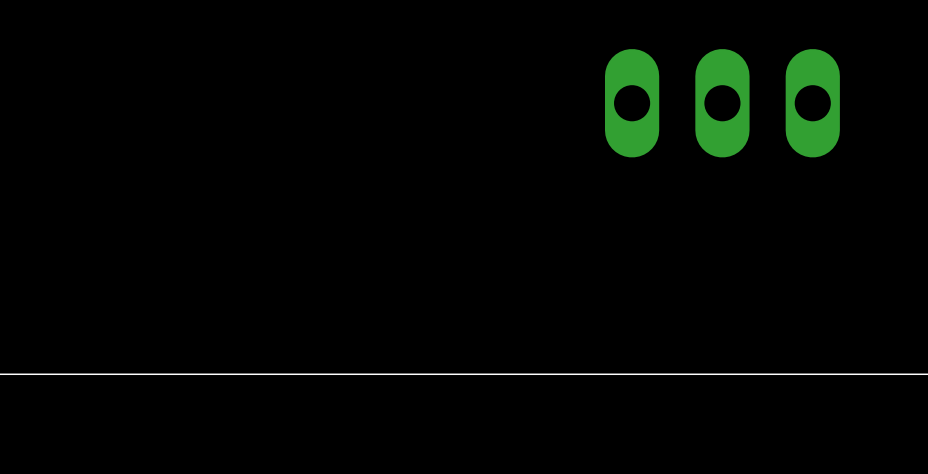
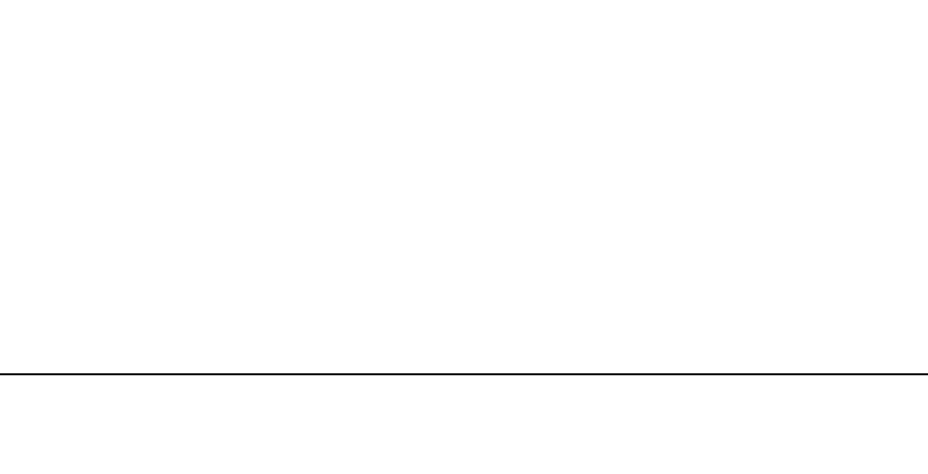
part: (722, 103) -> none

